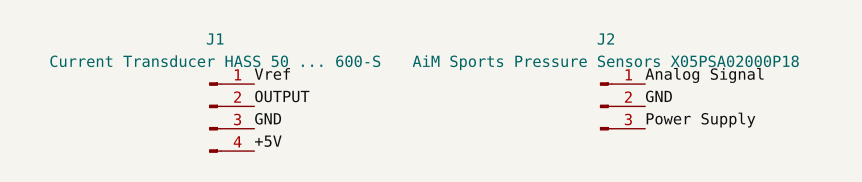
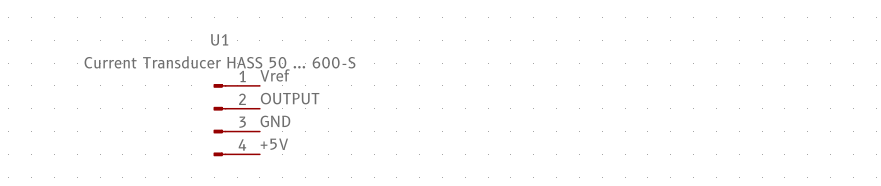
J1 name: J1 (215, 39) -> U1 (219, 39)
label: Analog Signal (704, 75) -> none
label: GND (658, 96) -> none
J2: AiM Sports Pressure Sensors X05PSA02000P18 (622, 106) -> none
label: Power Supply (700, 120) -> none

